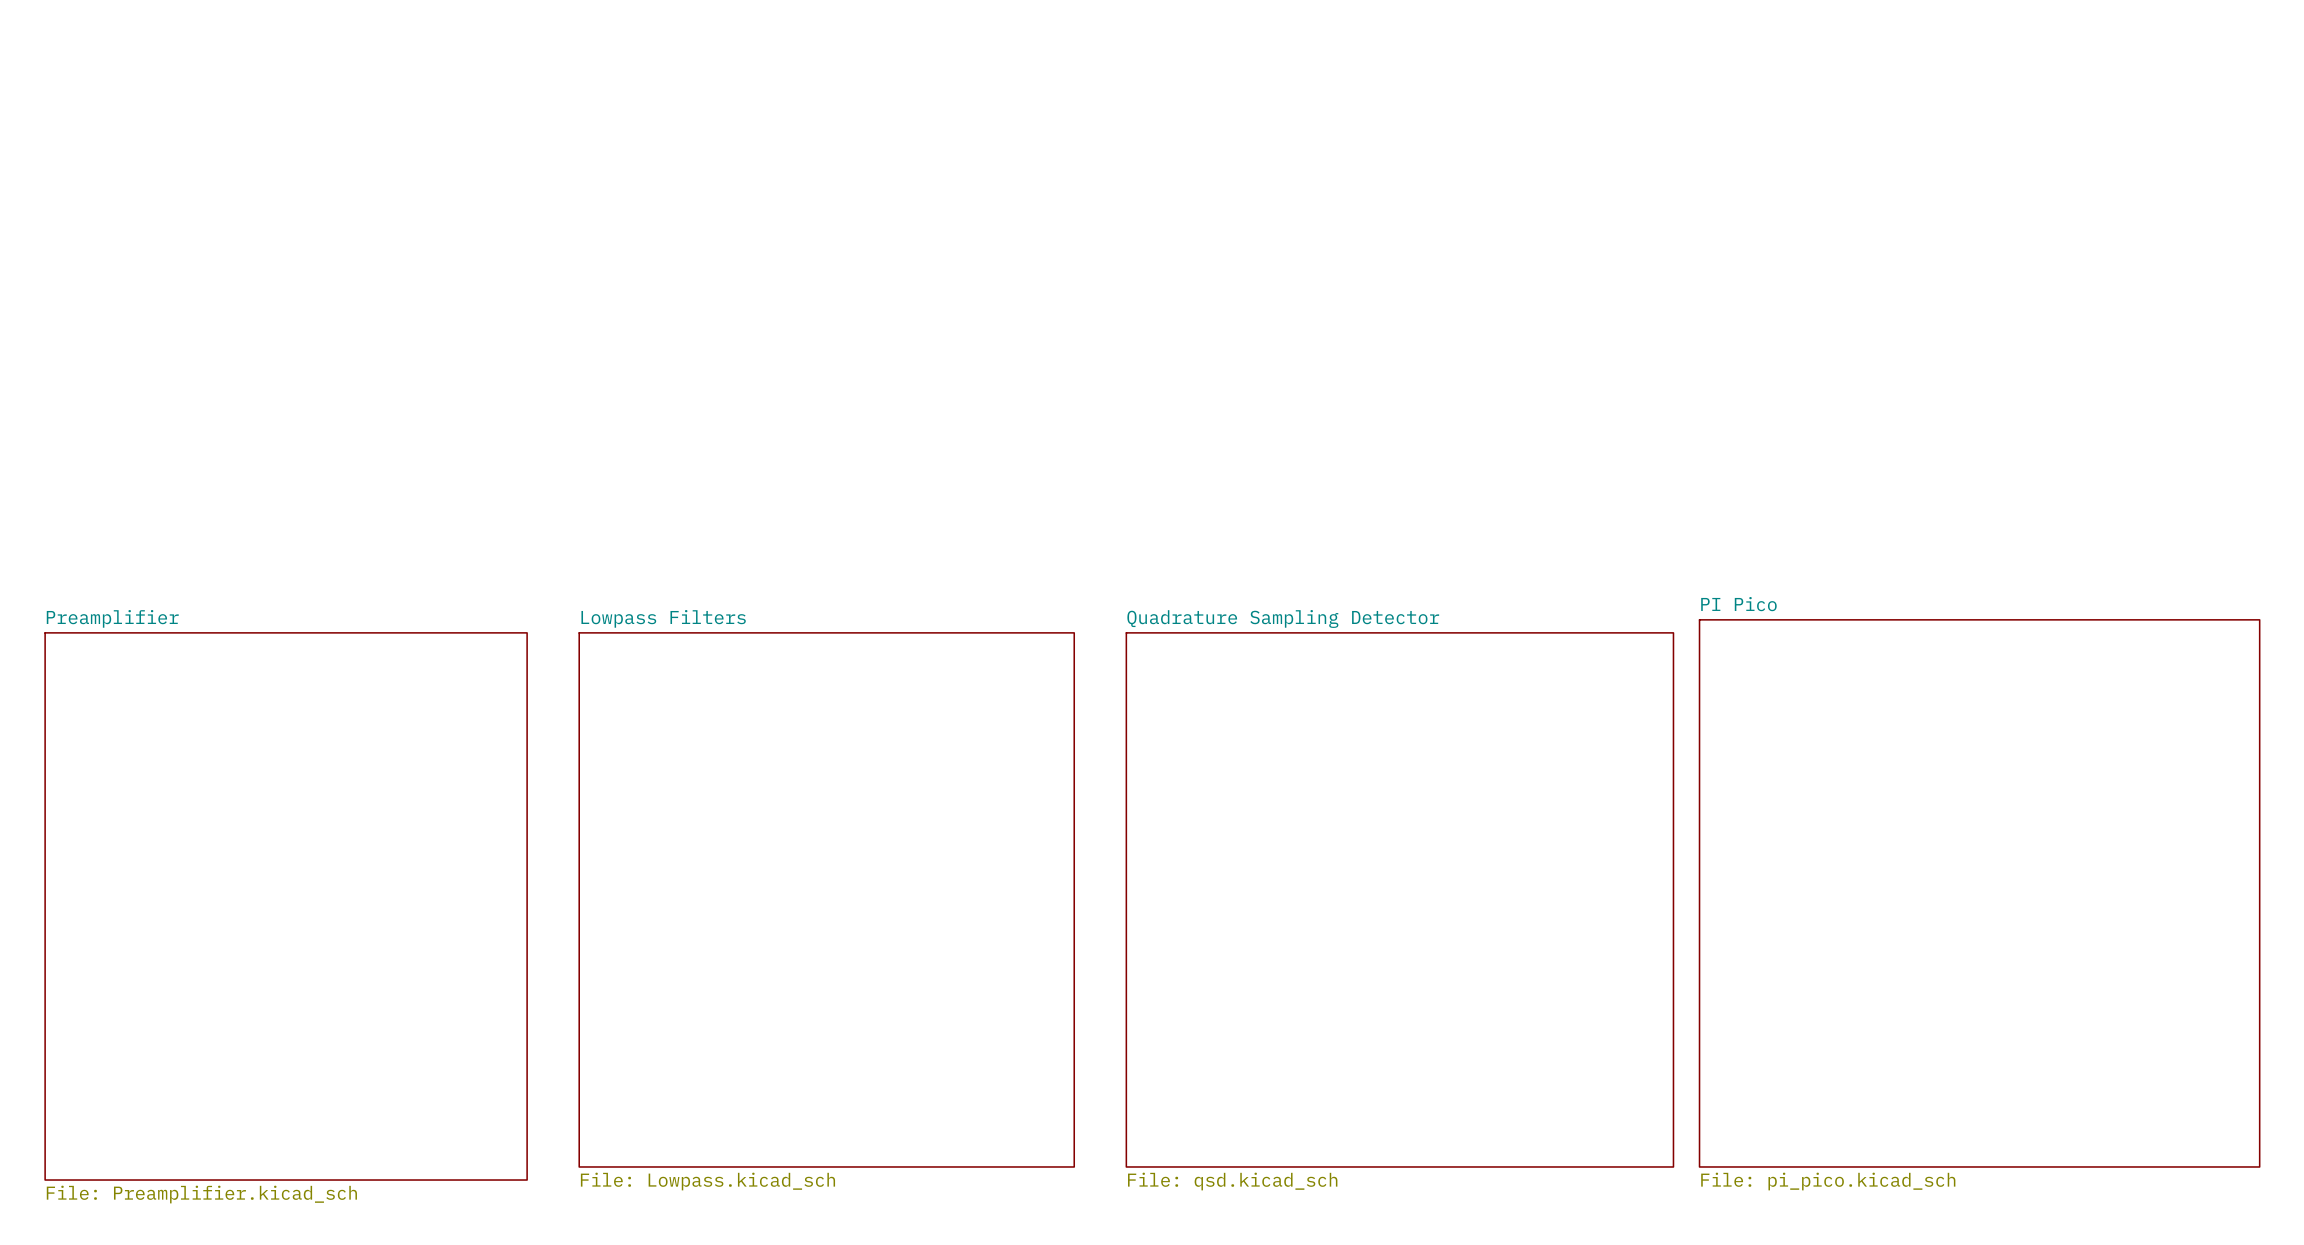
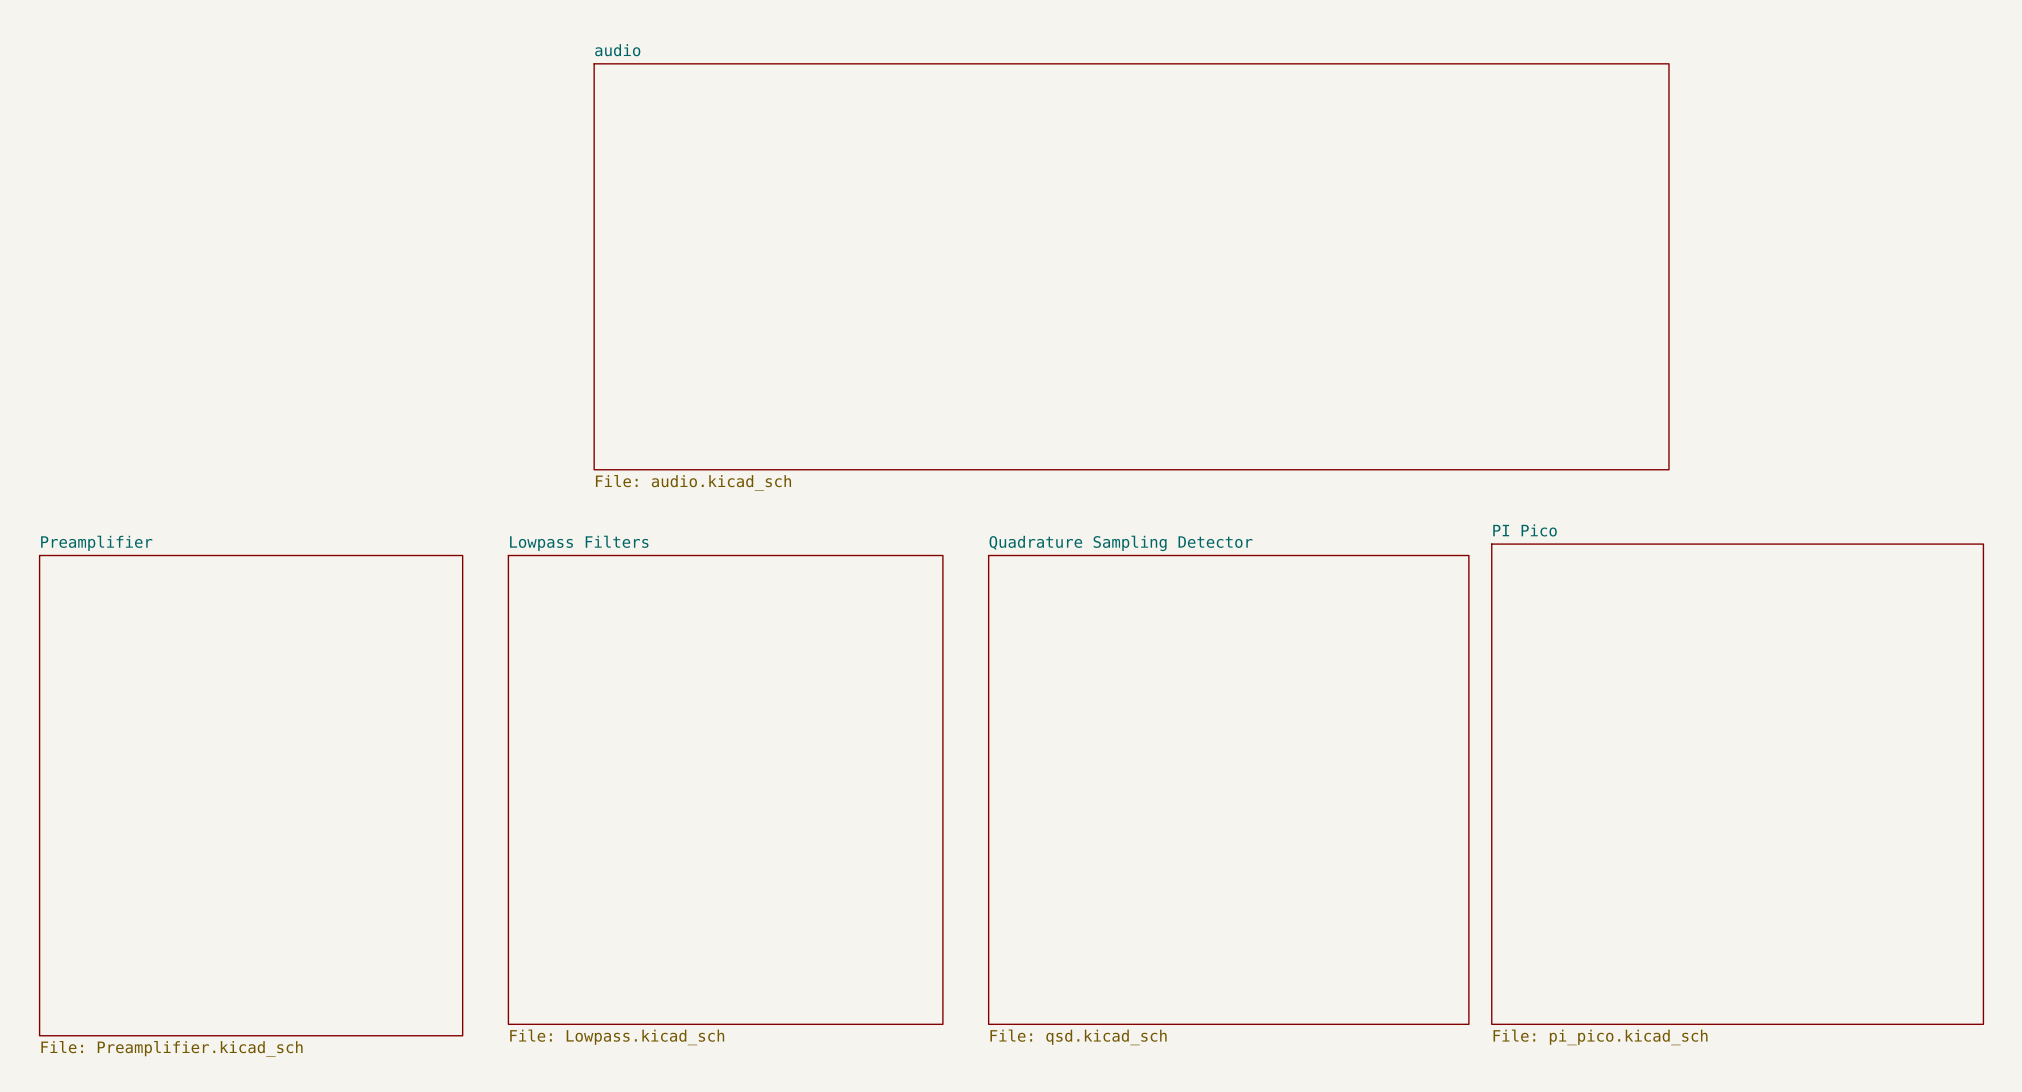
sheet audio: none -> File: audio.kicad_sch (1131, 266)

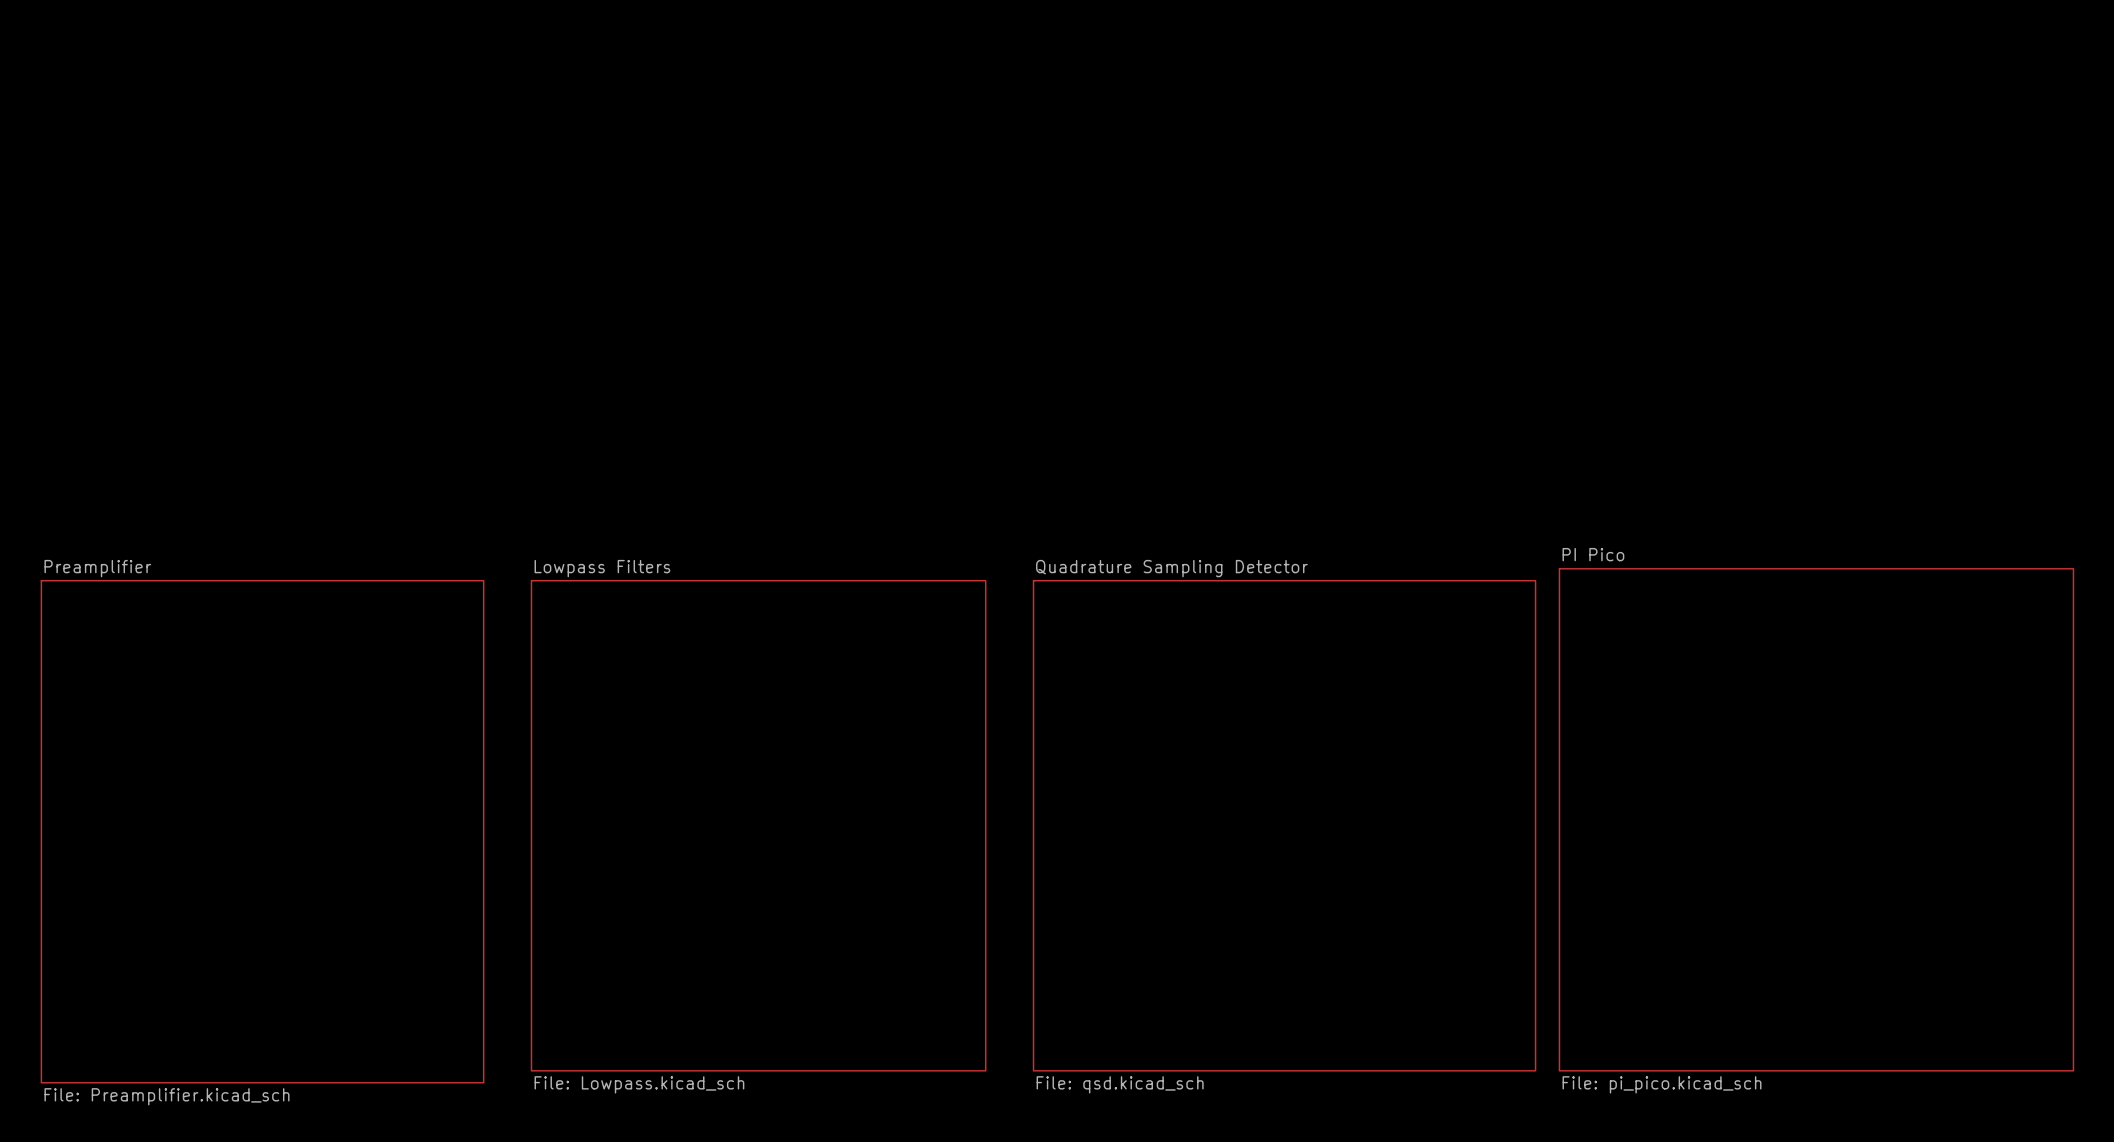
sheet audio: File: audio.kicad_sch (1131, 266) -> none

